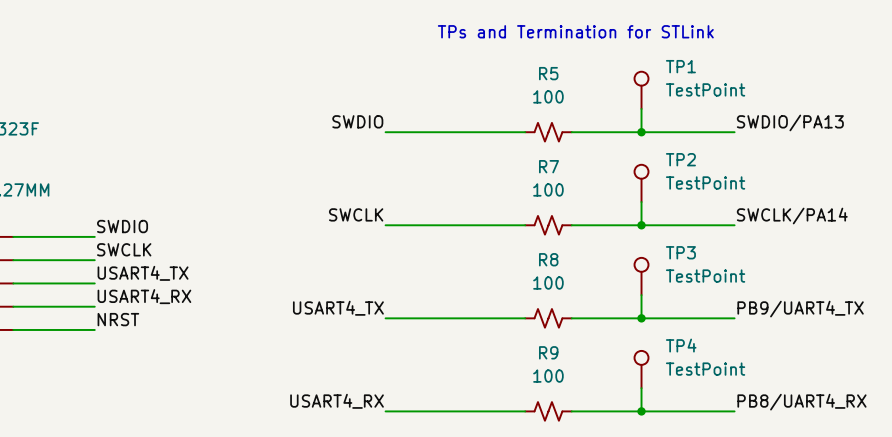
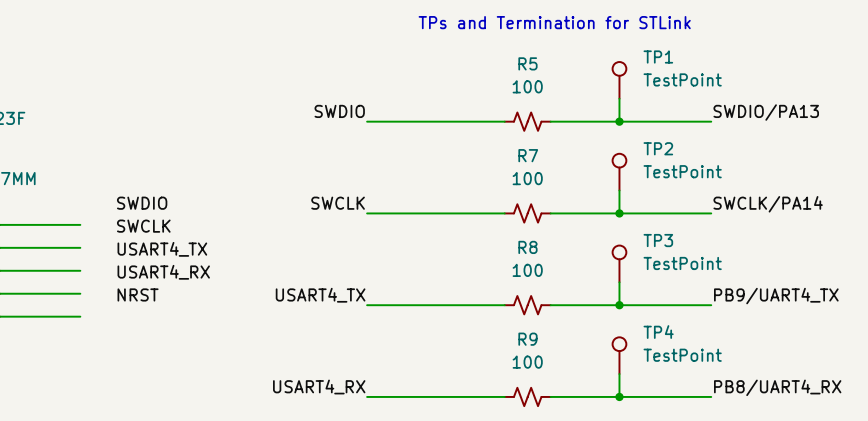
label position: SWDIO (122, 226) -> SWDIO (142, 203)
label position: SWCLK (124, 249) -> SWCLK (143, 226)
label position: USART4_TX (143, 273) -> USART4_TX (162, 249)
label position: USART4_RX (144, 296) -> USART4_RX (163, 272)
label position: NRST (118, 319) -> NRST (138, 294)

